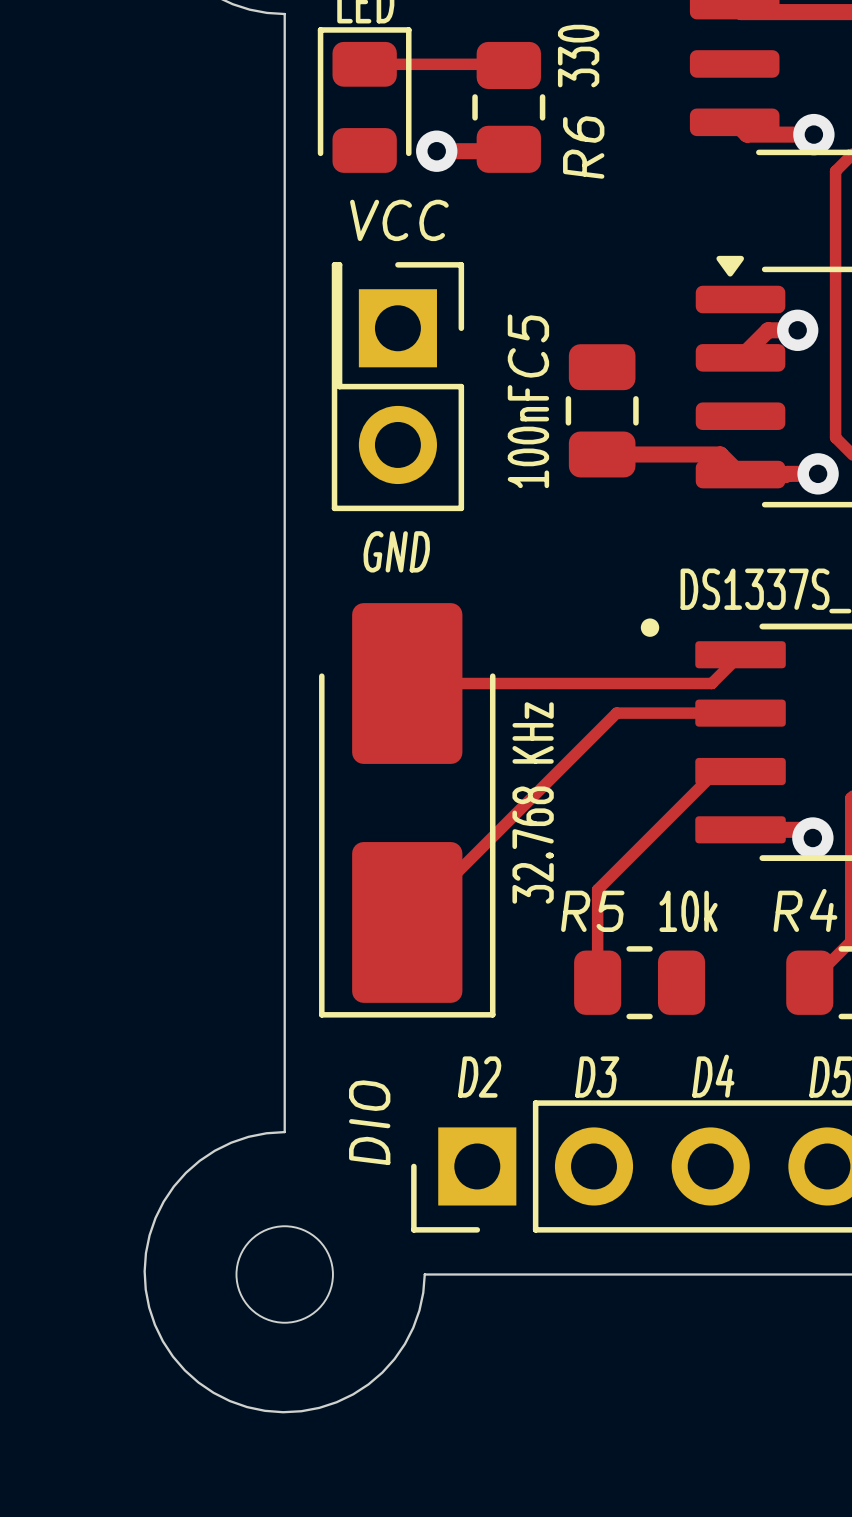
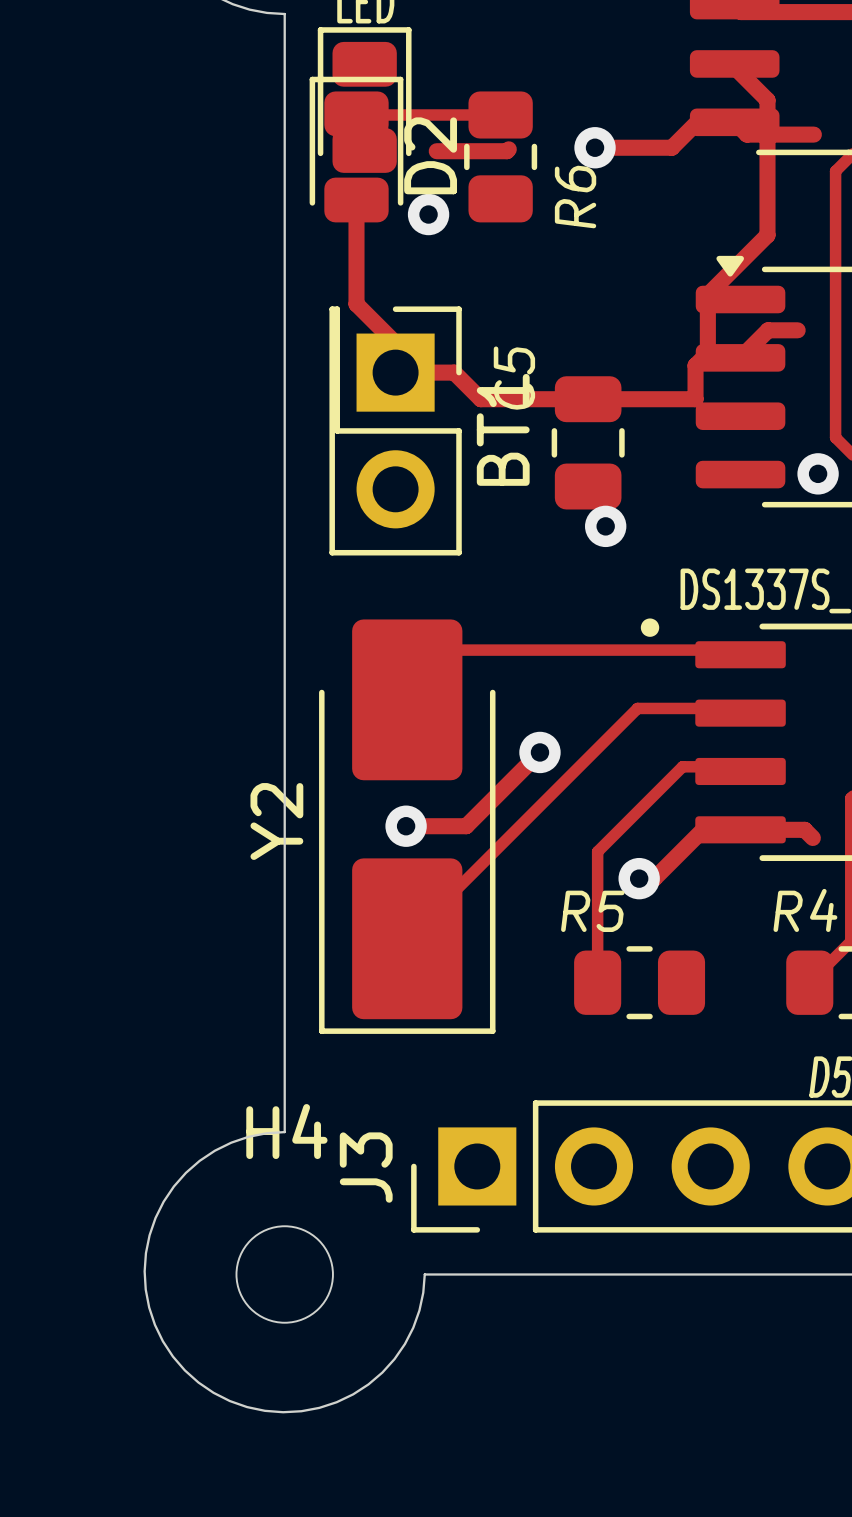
R6 value: 330 (578, 56) -> none
track: none -> (726, 59) (767, 100) (767, 235) (707, 294) (707, 353) (695, 365) (695, 399) (480, 399) (454, 372) (395, 372)
track: (364, 64) (508, 65) -> none
R6 position: (508, 107) -> (500, 156)
track: none -> (356, 113) (500, 114)
track: none -> (702, 117) (671, 147) (595, 147)
via: (813, 134) -> none
via: none -> (595, 147)
D2: none -> (356, 149)
via position: (436, 151) -> (428, 214)
track: none -> (356, 200) (356, 304) (424, 372)
VCC name: VCC (399, 220) -> BT1 (503, 429)
via: (797, 330) -> none
VCC position: (397, 386) -> (395, 430)
C5 position: (602, 410) -> (588, 442)
C5 value: 100nF (528, 436) -> none
track: (602, 454) (720, 454) (740, 474) (818, 473) -> none
via: none -> (605, 526)
text: GND (396, 551) -> none
track: none -> (707, 650) (457, 650) (407, 699)
track: (740, 654) (711, 683) (407, 683) -> none
track: none -> (707, 708) (637, 708) (407, 938)
track: (740, 713) (616, 713) (407, 922) -> none
track: none -> (539, 752) (466, 826) (406, 826)
via: none -> (539, 752)
track: (740, 771) (715, 771) (597, 889) -> (707, 766) (682, 766) (597, 851) (597, 889)
Y2 value: 32.768 KHz (533, 802) -> none
Y2 position: (407, 810) -> (407, 826)
Y2 name: none -> Y2 (276, 821)
track: none -> (707, 825) (654, 878) (639, 878)
via: none -> (406, 826)
via: (812, 838) -> none
via: none -> (639, 878)
R5 value: 10k (688, 911) -> none
text: D4 (713, 1076) -> none
text: D2 (479, 1077) -> none
text: D3 (597, 1077) -> none
DIO name: DIO (369, 1122) -> J3 (366, 1167)
H4 name: none -> H4 (286, 1131)

